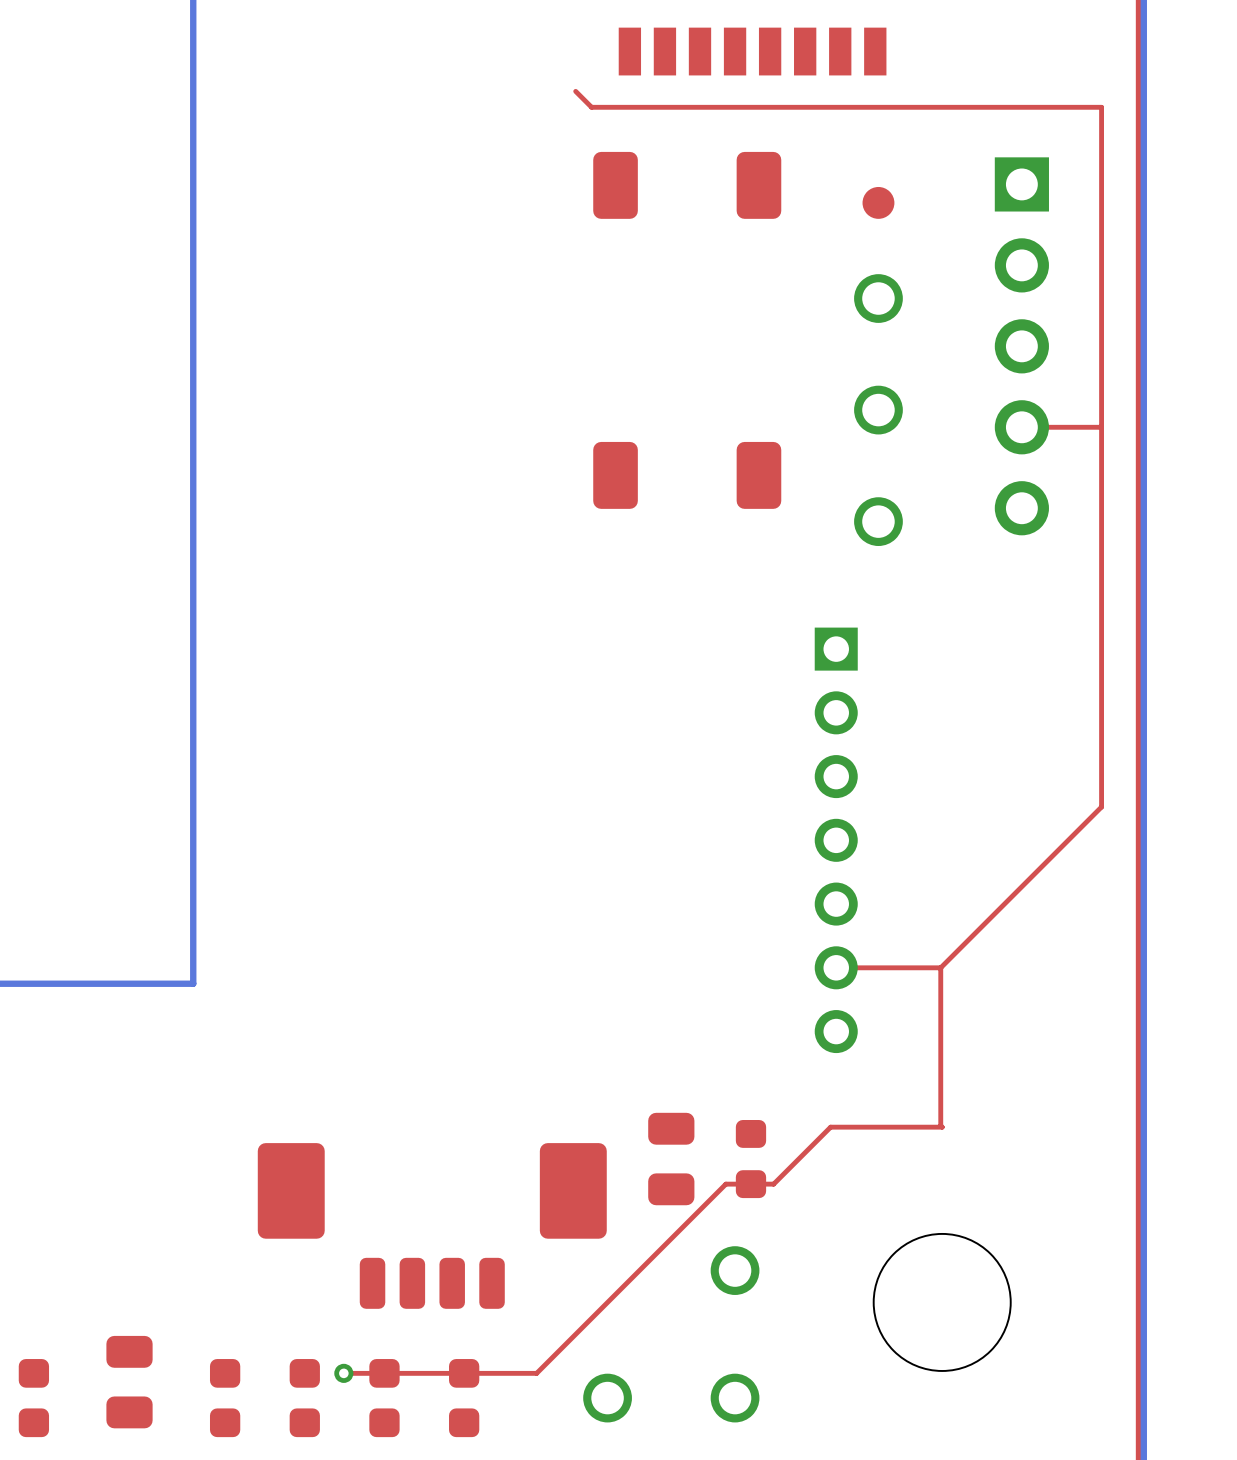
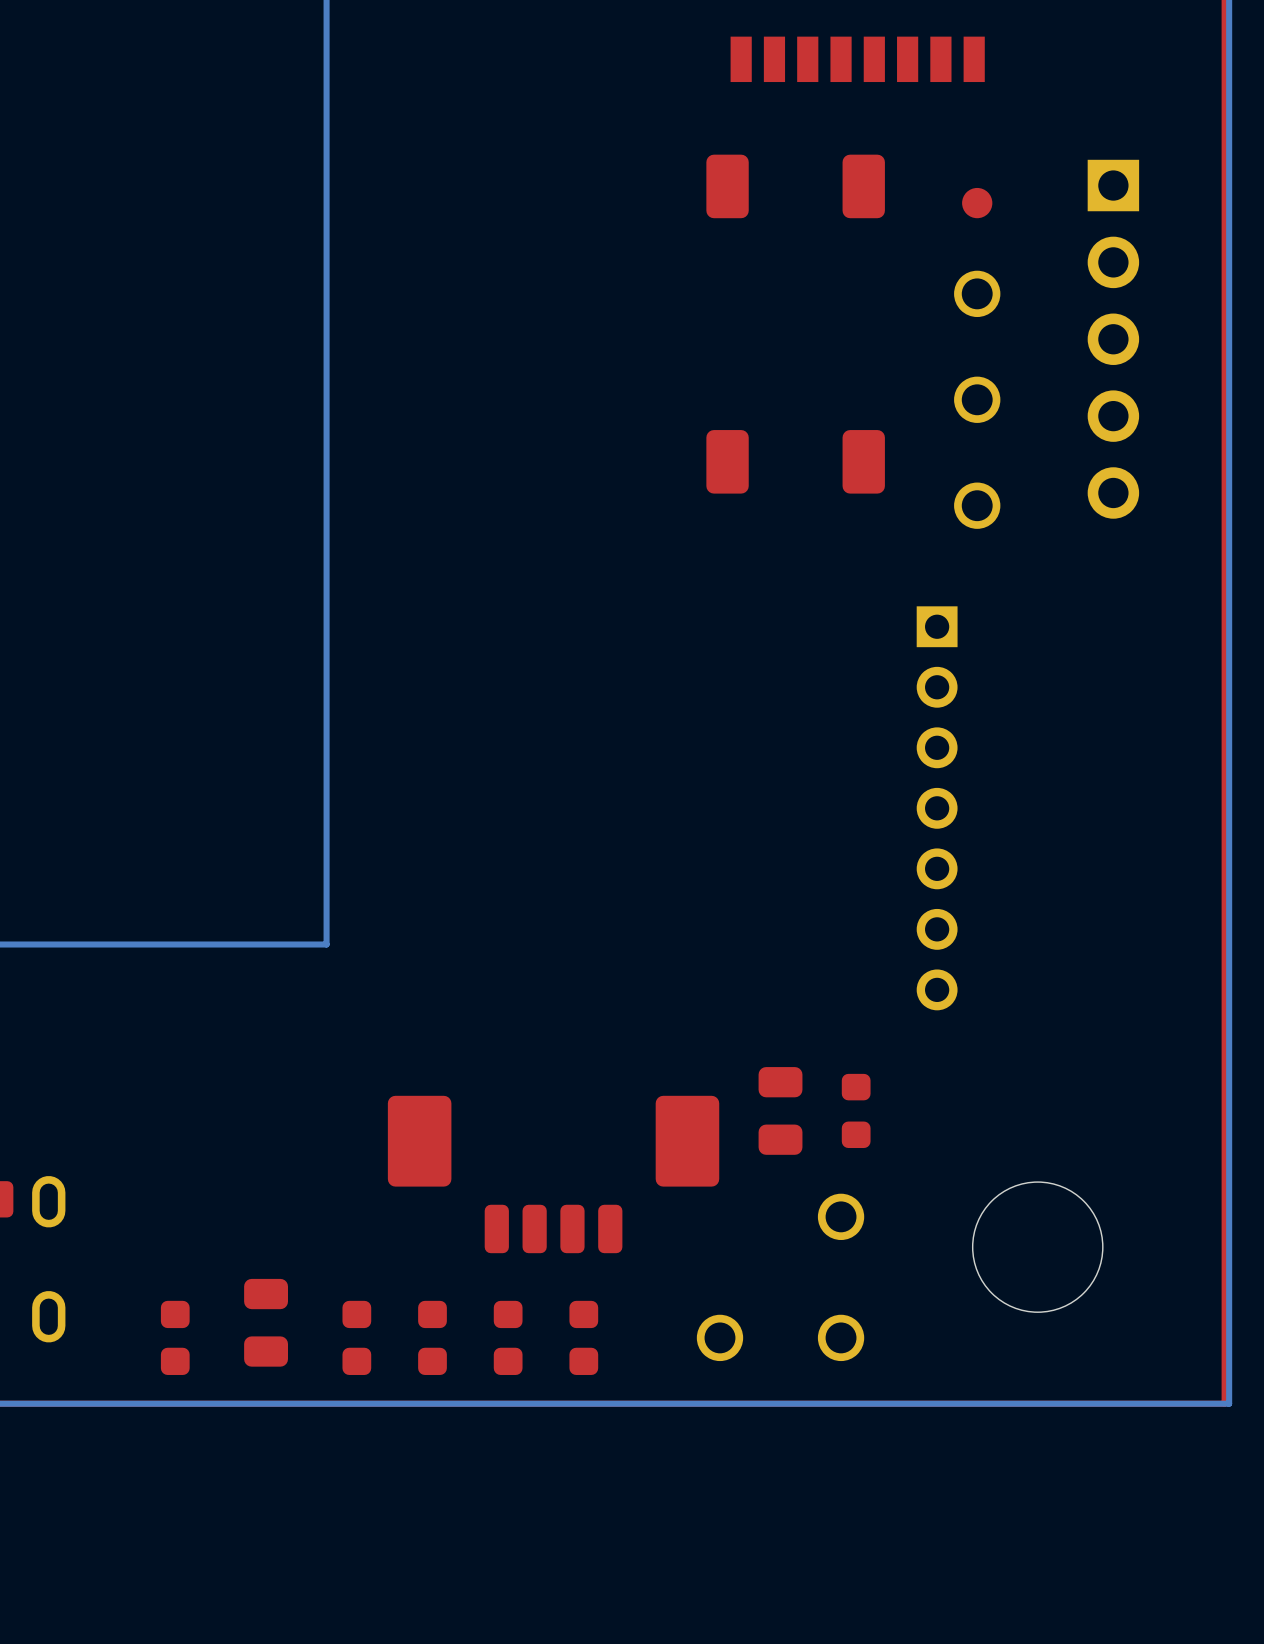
top track: (575, 91) (591, 107) (1101, 107) (1101, 807) (940, 967) -> none
top track: (1101, 426) (1021, 427) -> none
top track: (940, 967) (942, 1127) (830, 1127) (773, 1184) (725, 1184) (536, 1373) (343, 1373) -> none
top track: (940, 967) (836, 967) -> none
via: (343, 1373) -> none

